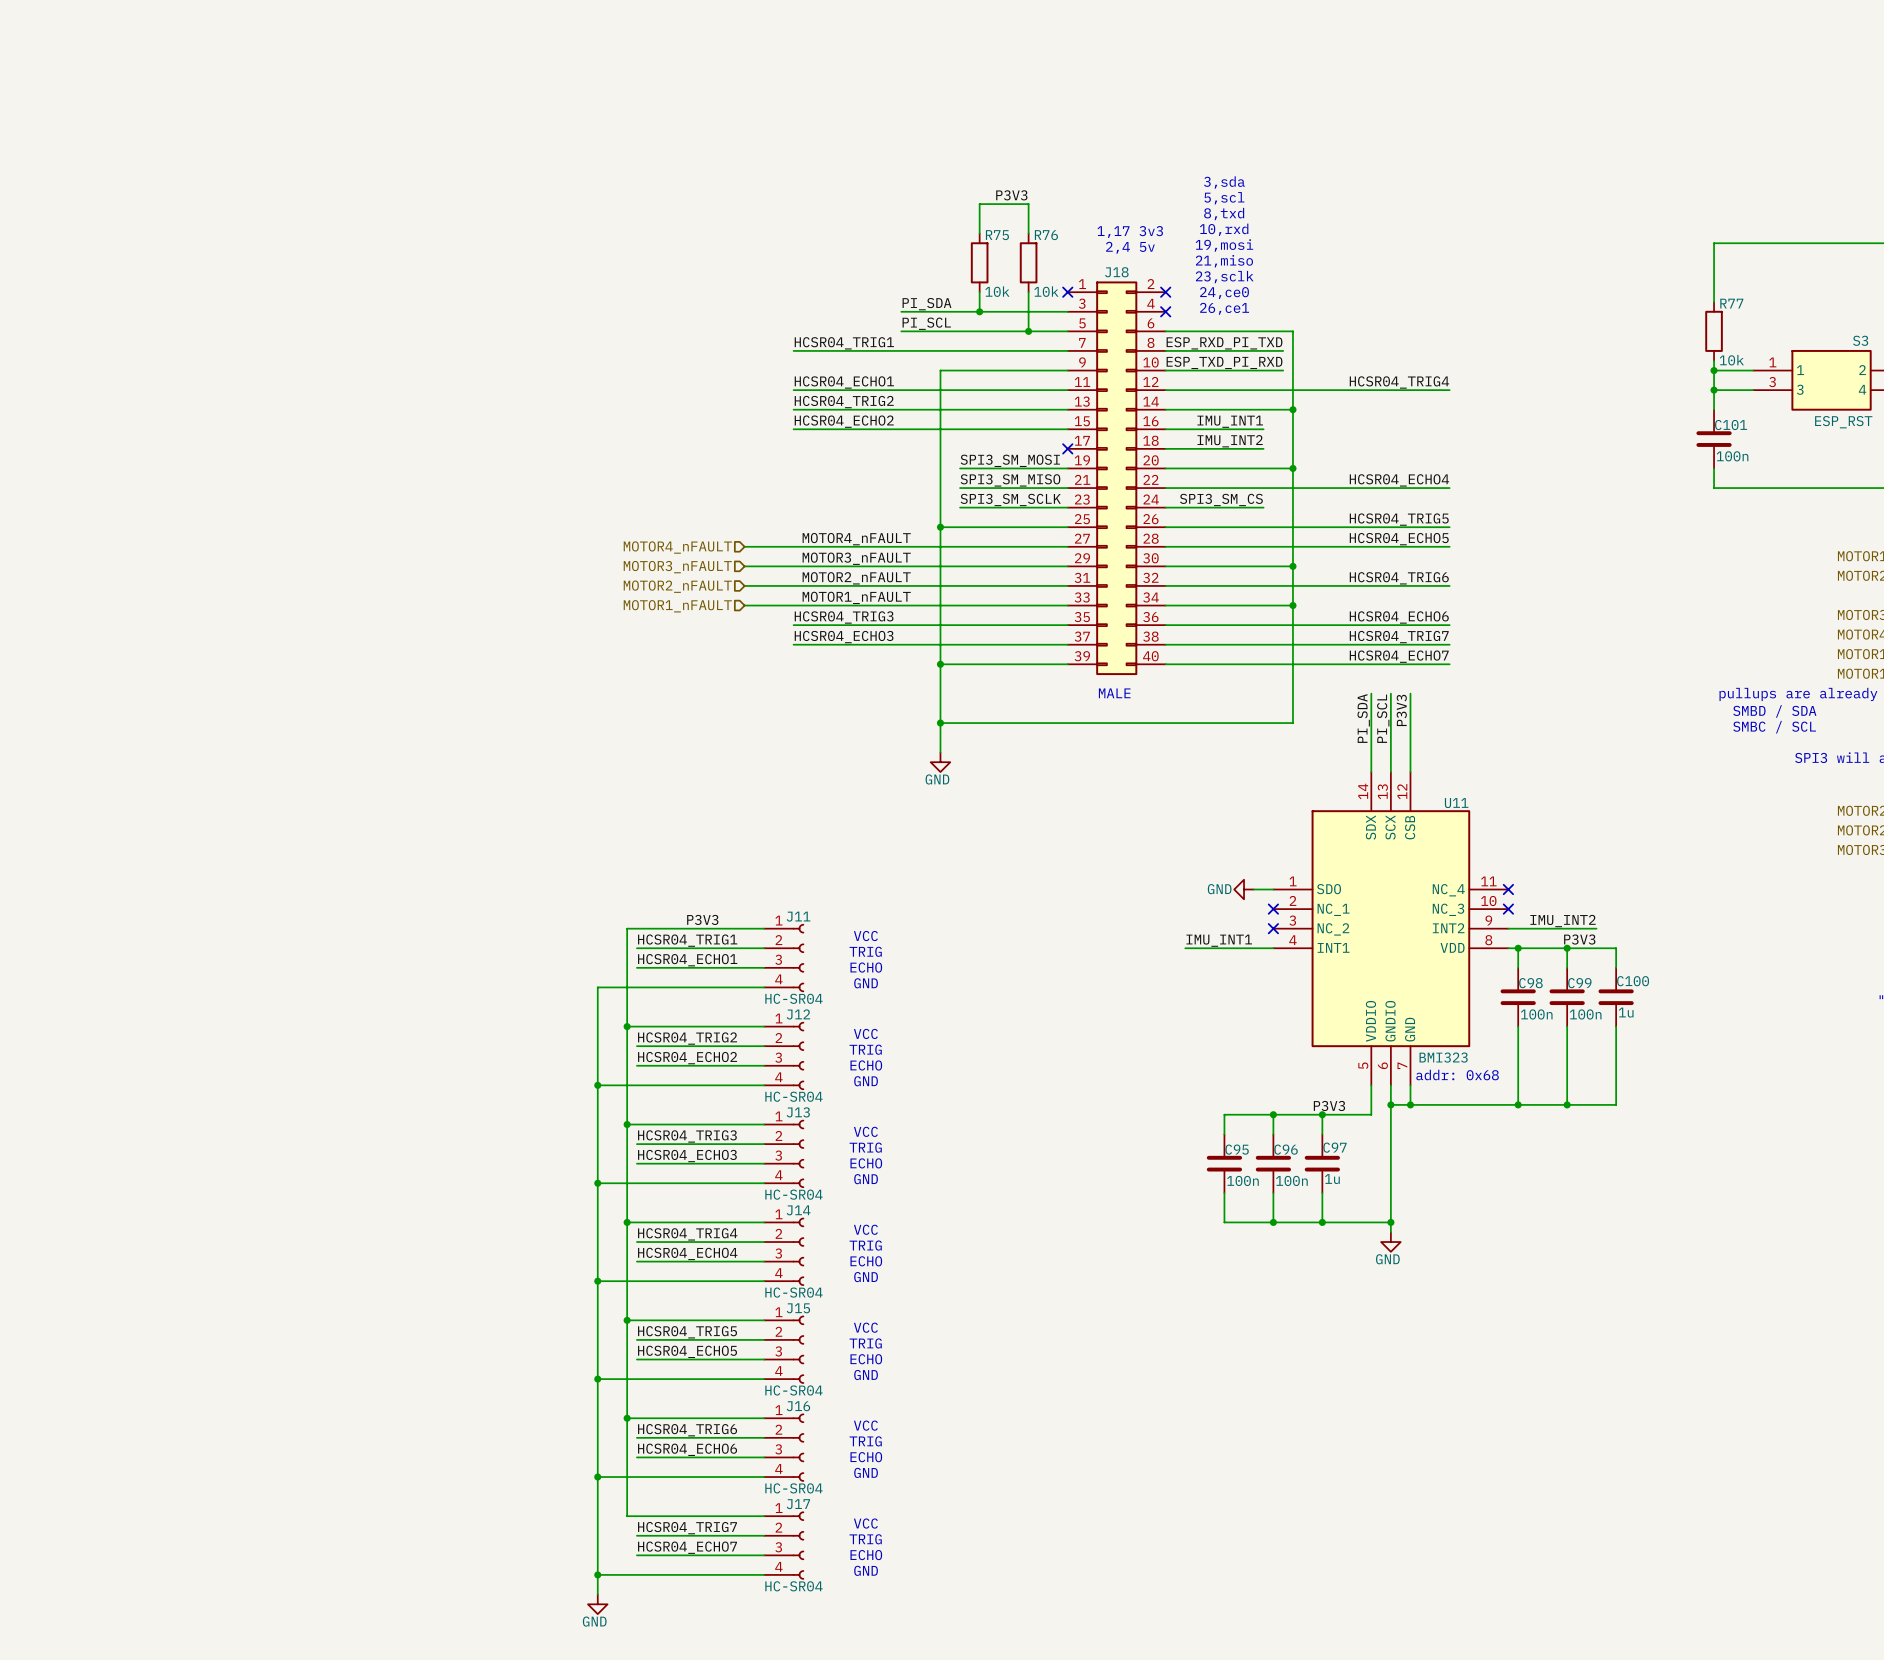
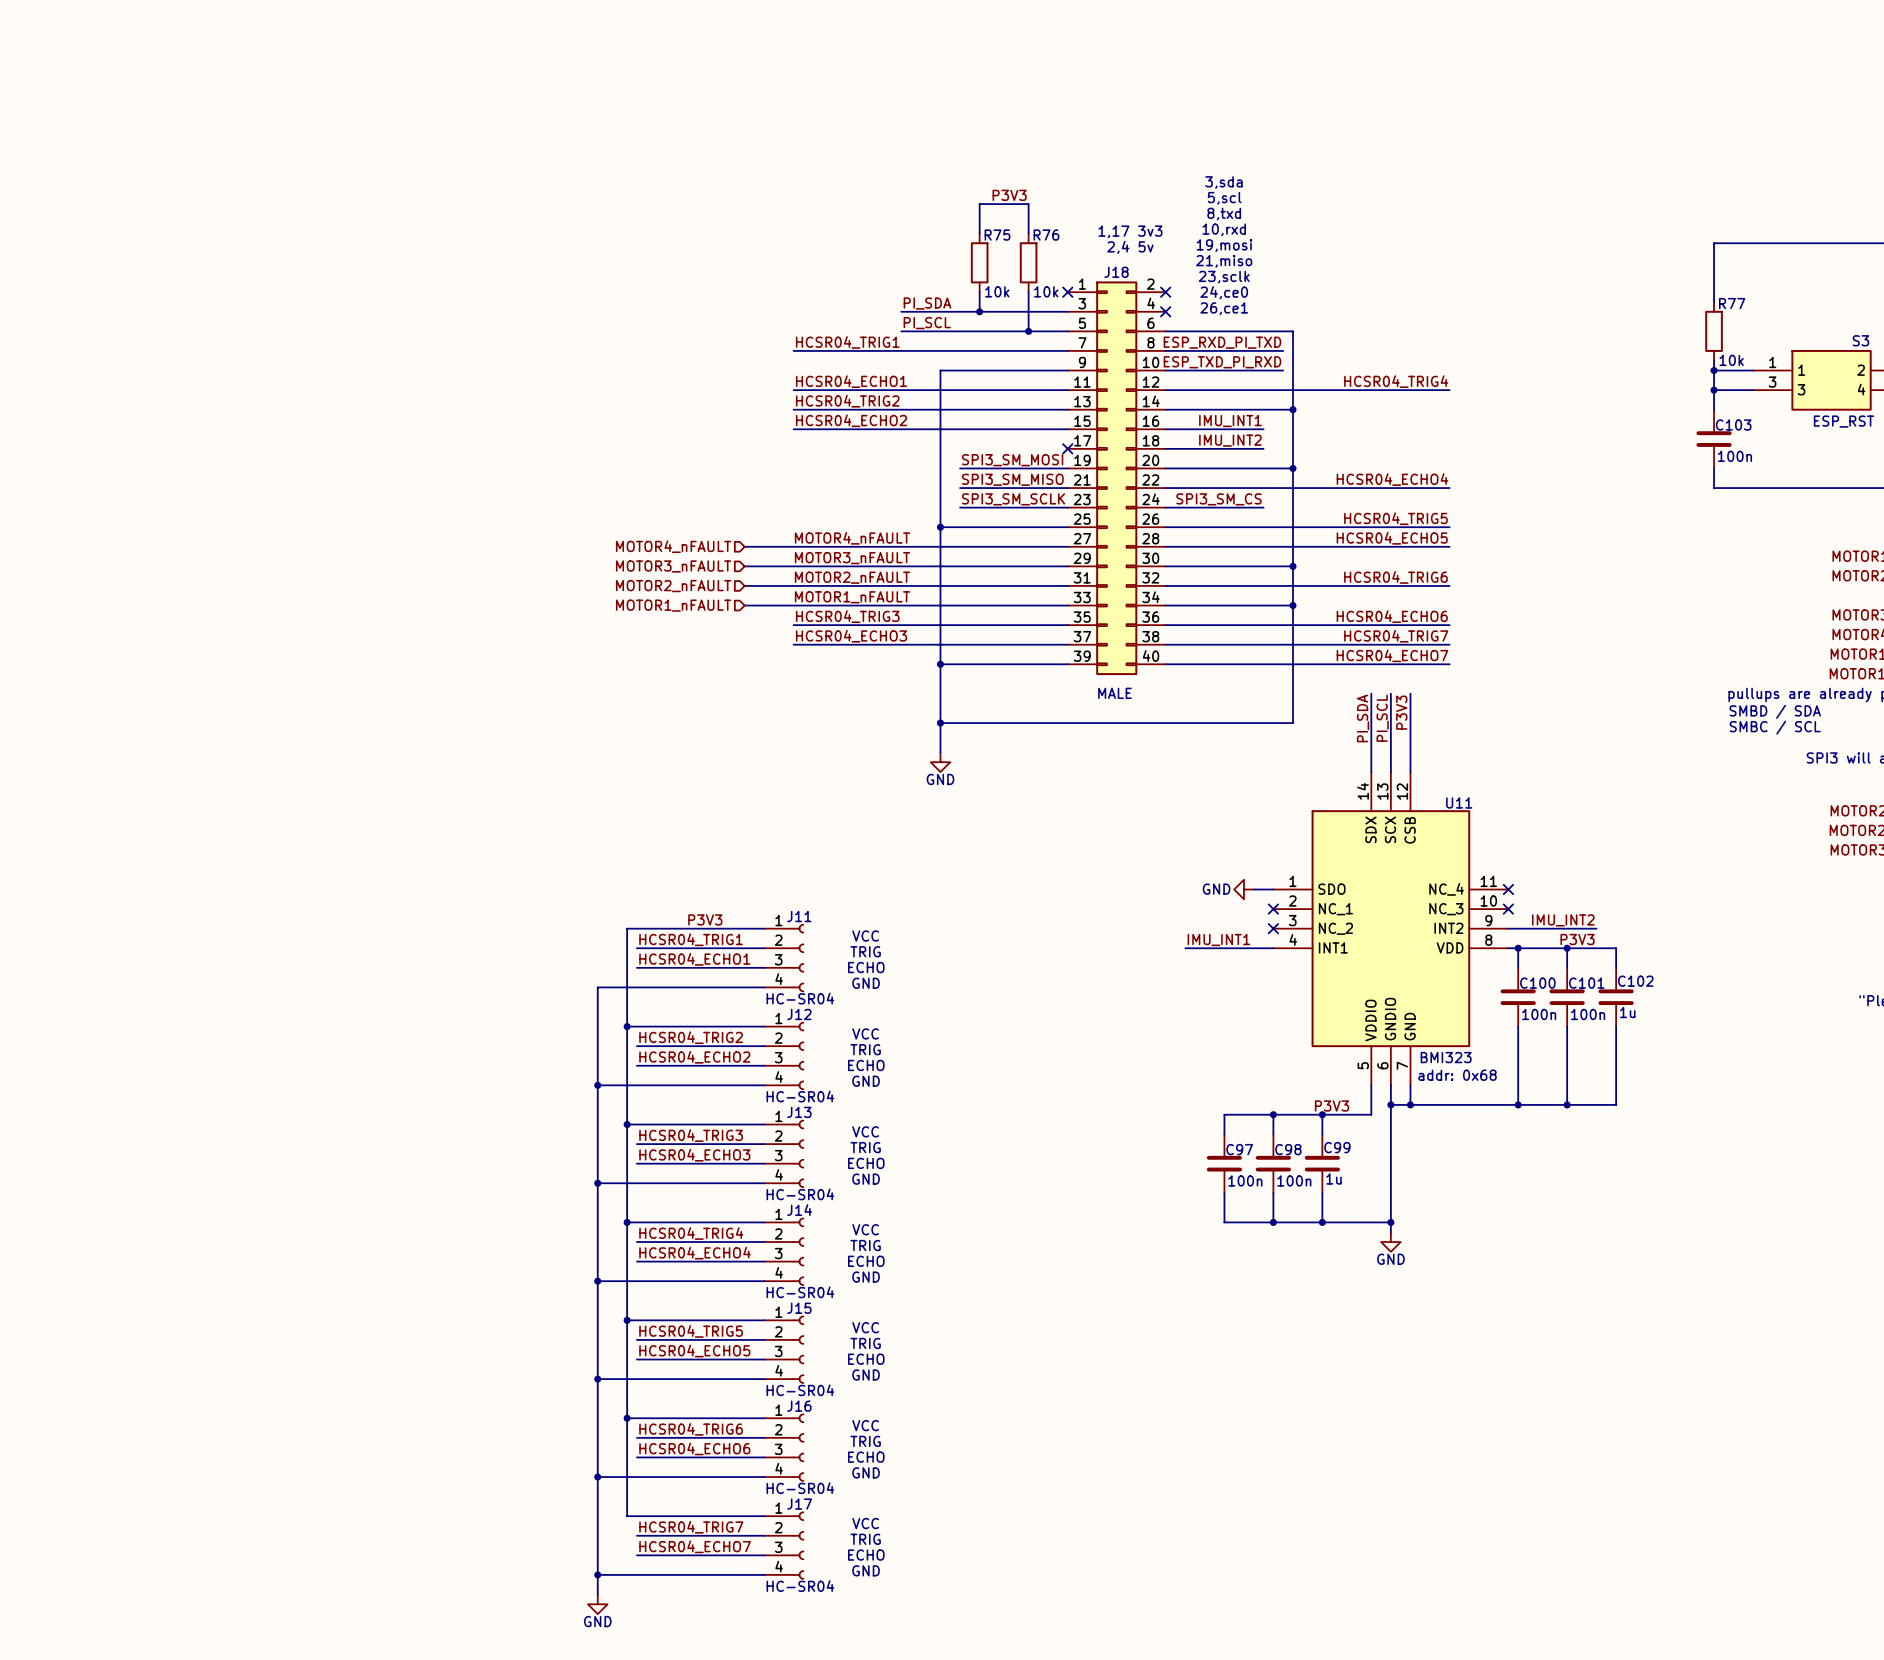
C101 name: C101 (1731, 425) -> C103 (1733, 425)
C100 name: C100 (1633, 981) -> C102 (1635, 981)
C98 name: C98 (1530, 983) -> C100 (1537, 983)
C99 name: C99 (1579, 983) -> C101 (1586, 983)
C97 name: C97 (1334, 1147) -> C99 (1337, 1147)
C95 name: C95 (1237, 1149) -> C97 (1239, 1149)
C96 name: C96 (1286, 1149) -> C98 (1288, 1149)

